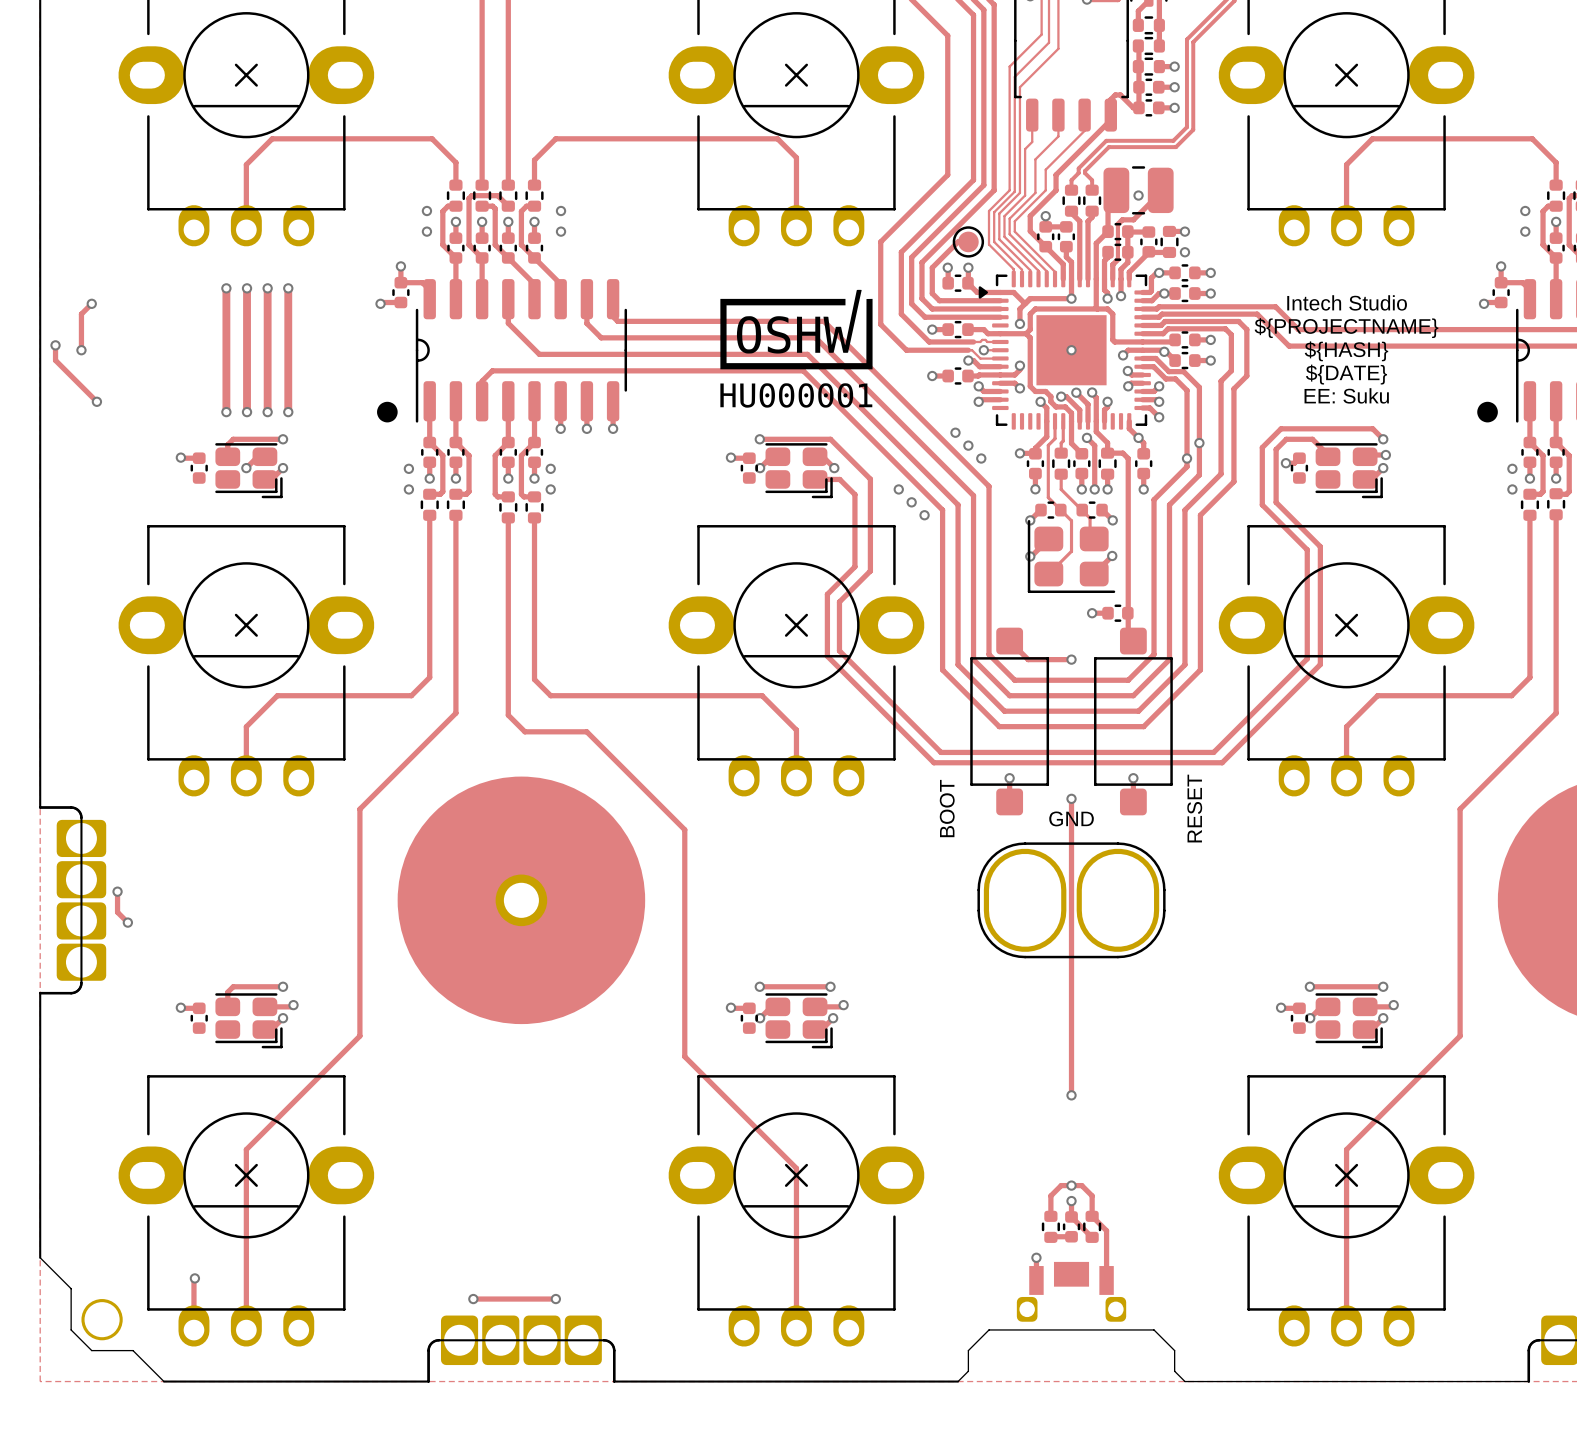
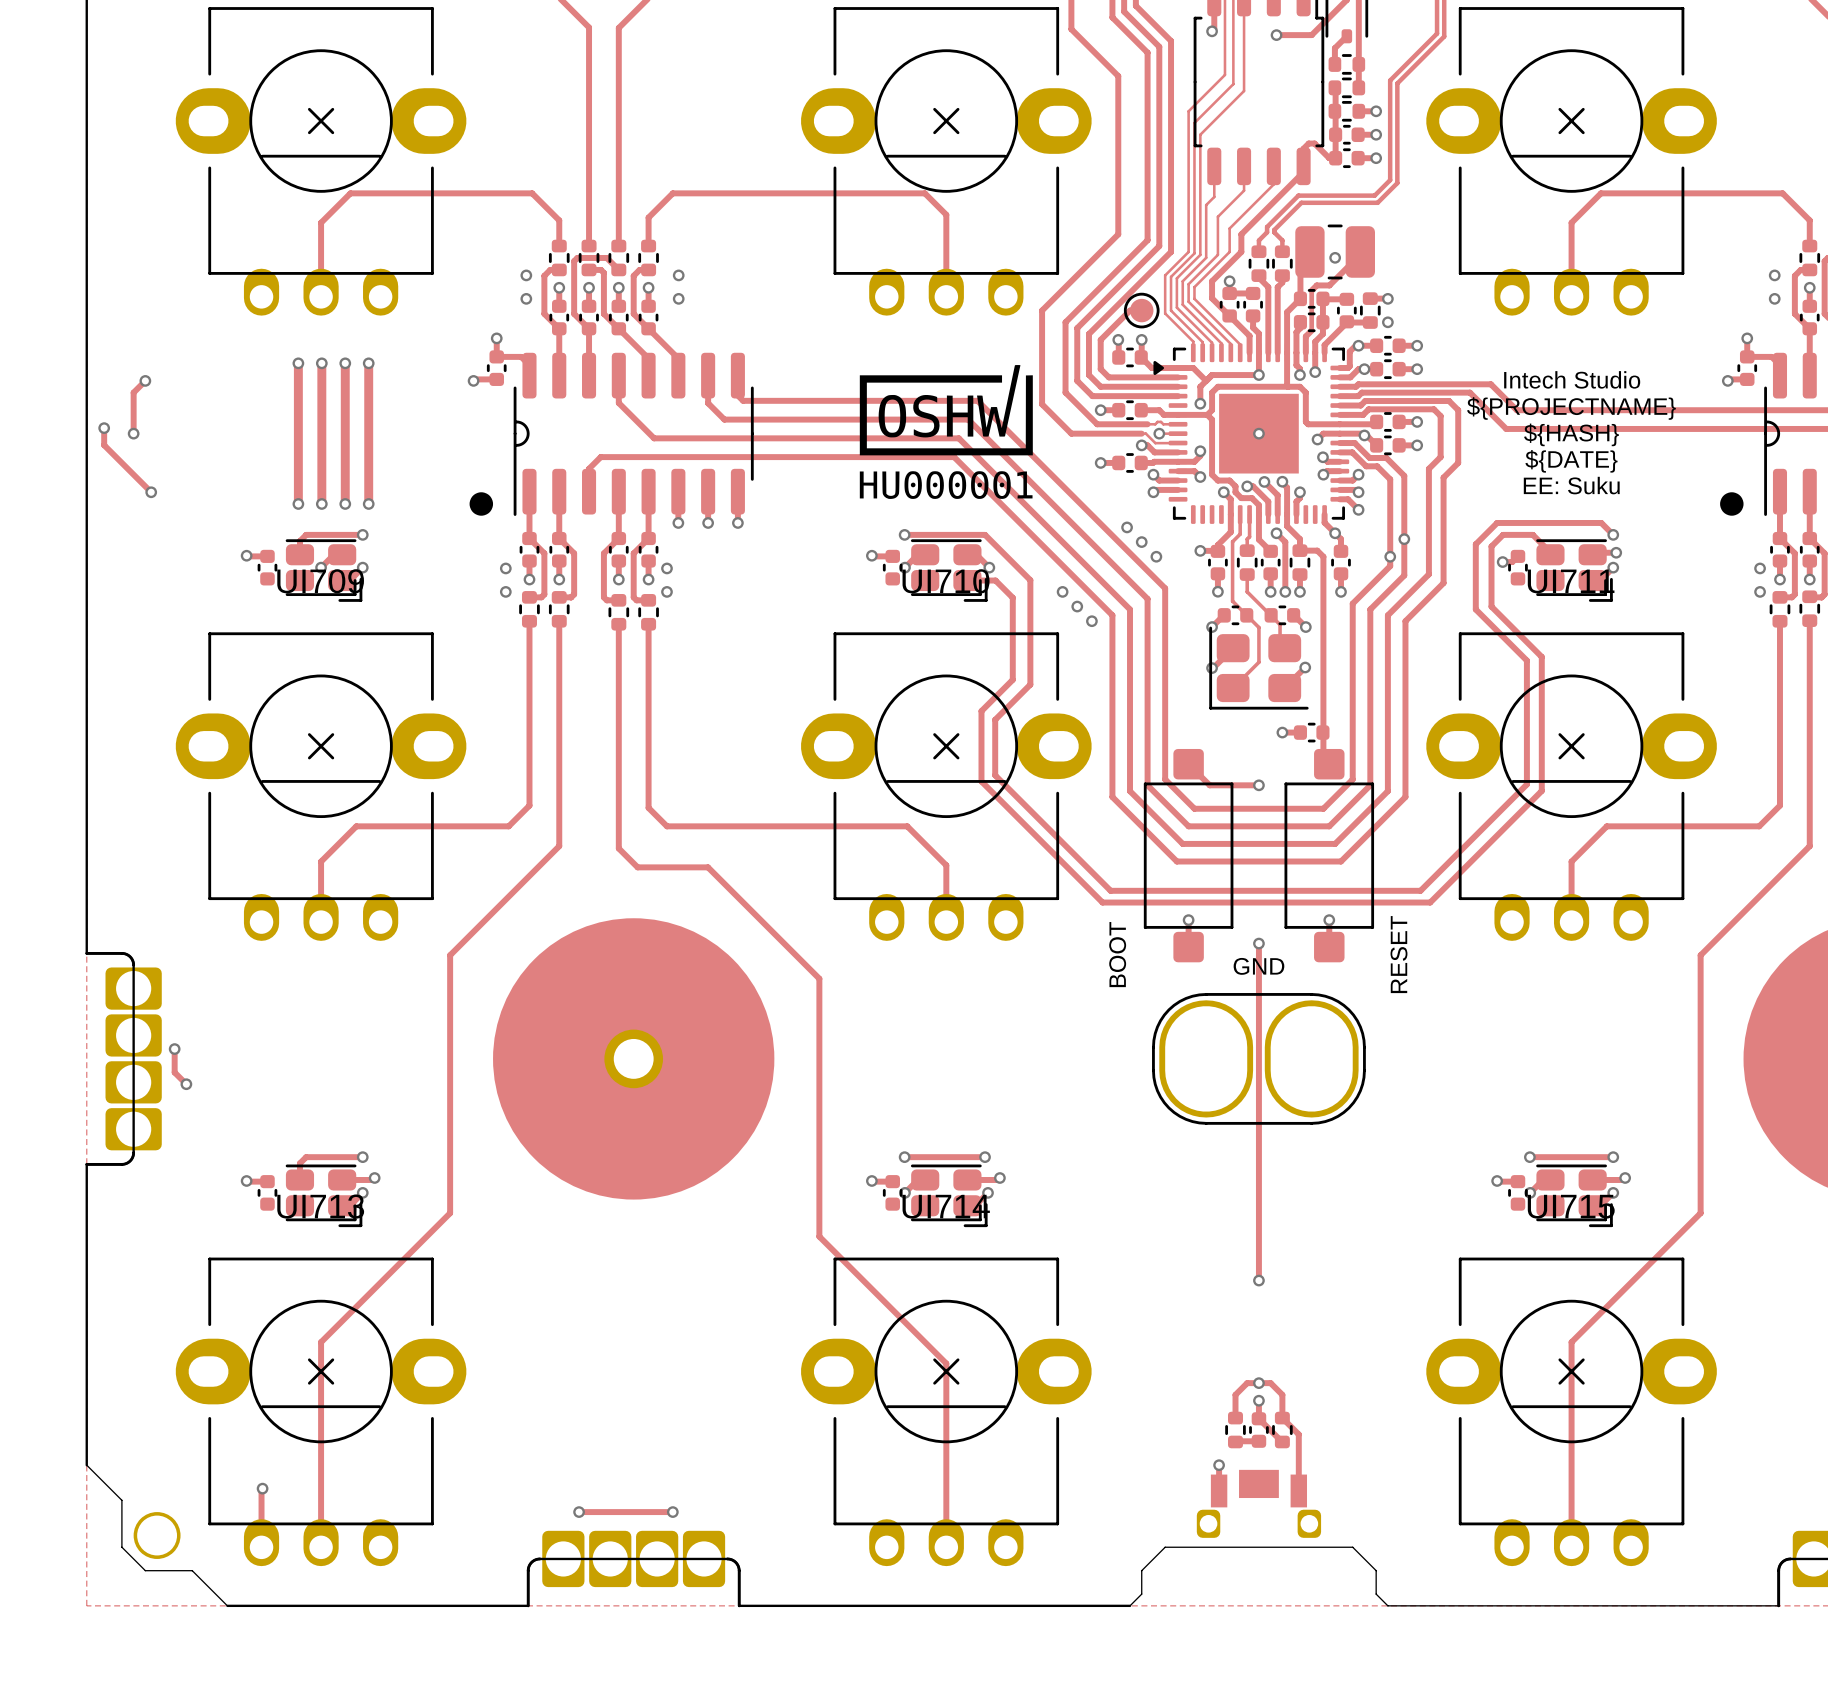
UI709 name: none -> UI709 (320, 581)
UI710 name: none -> UI710 (946, 581)
UI711 name: none -> UI711 (1571, 581)
UI713 name: none -> UI713 (320, 1206)
UI714 name: none -> UI714 (946, 1206)
UI715 name: none -> UI715 (1571, 1206)

